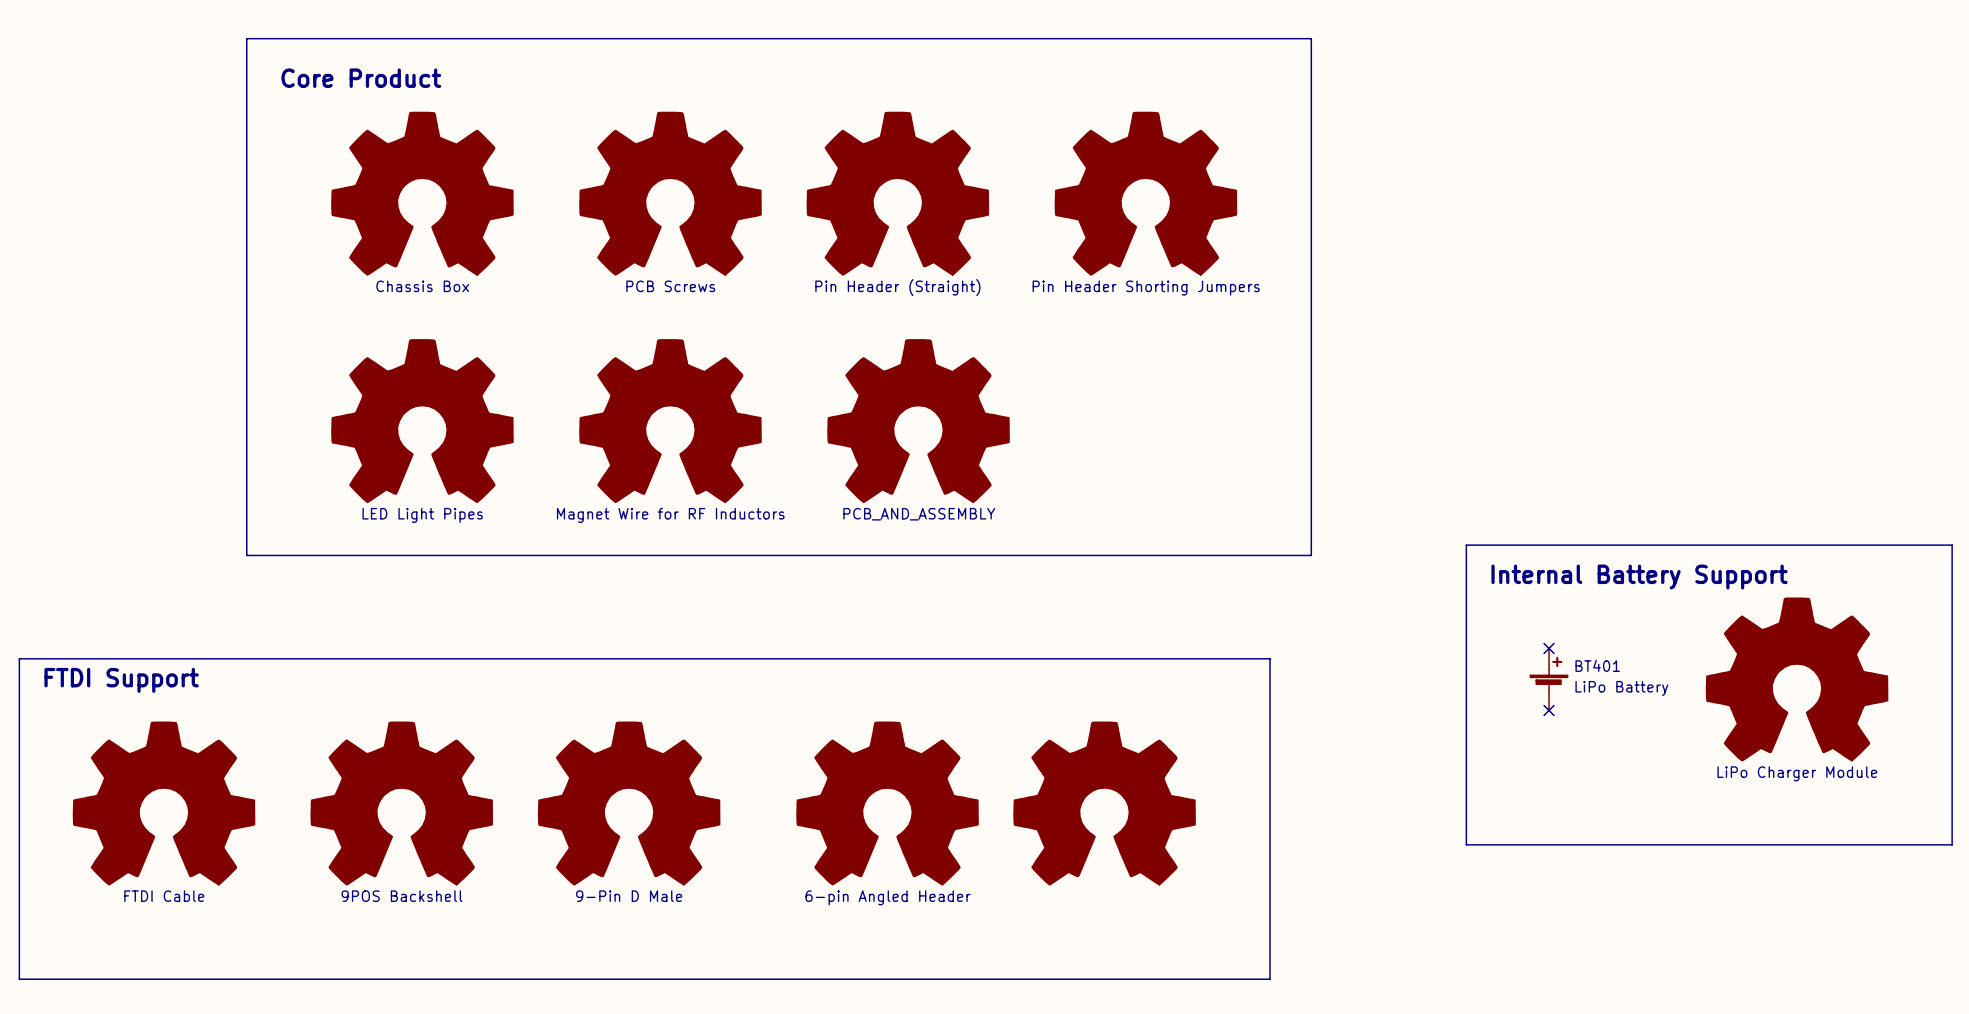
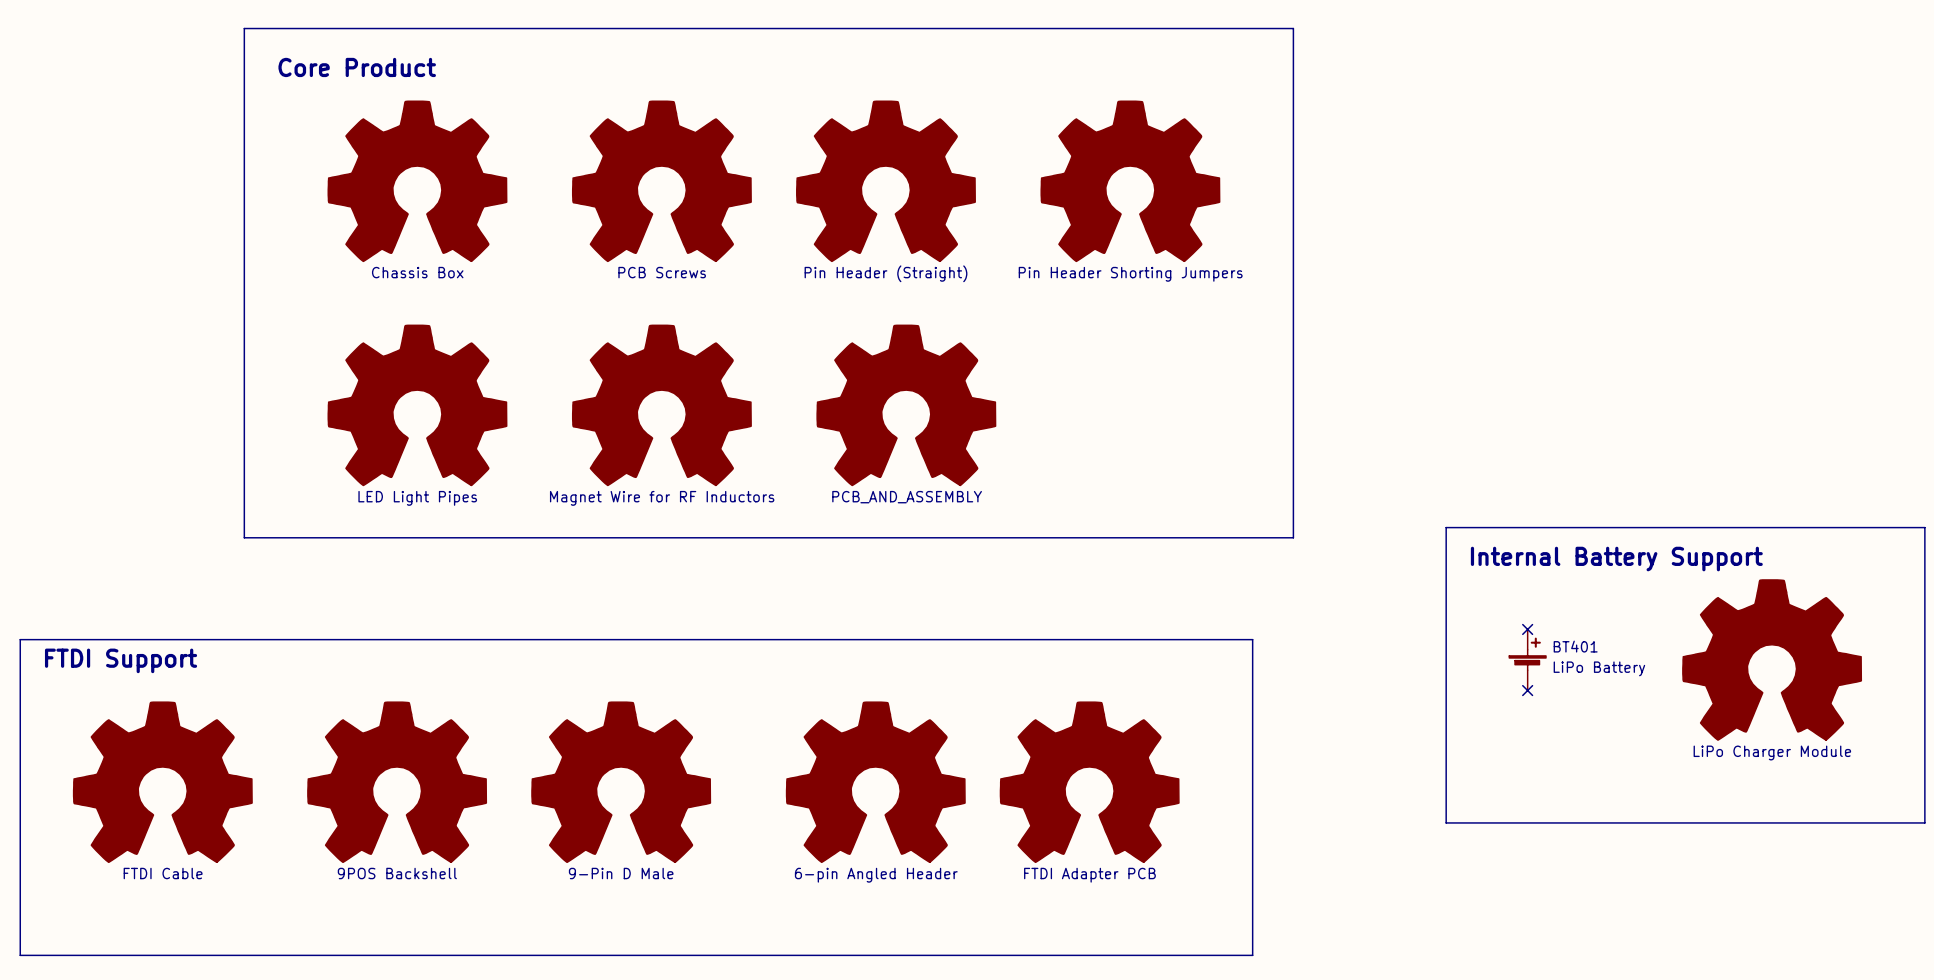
part value: none -> FTDI Adapter PCB (1089, 875)

